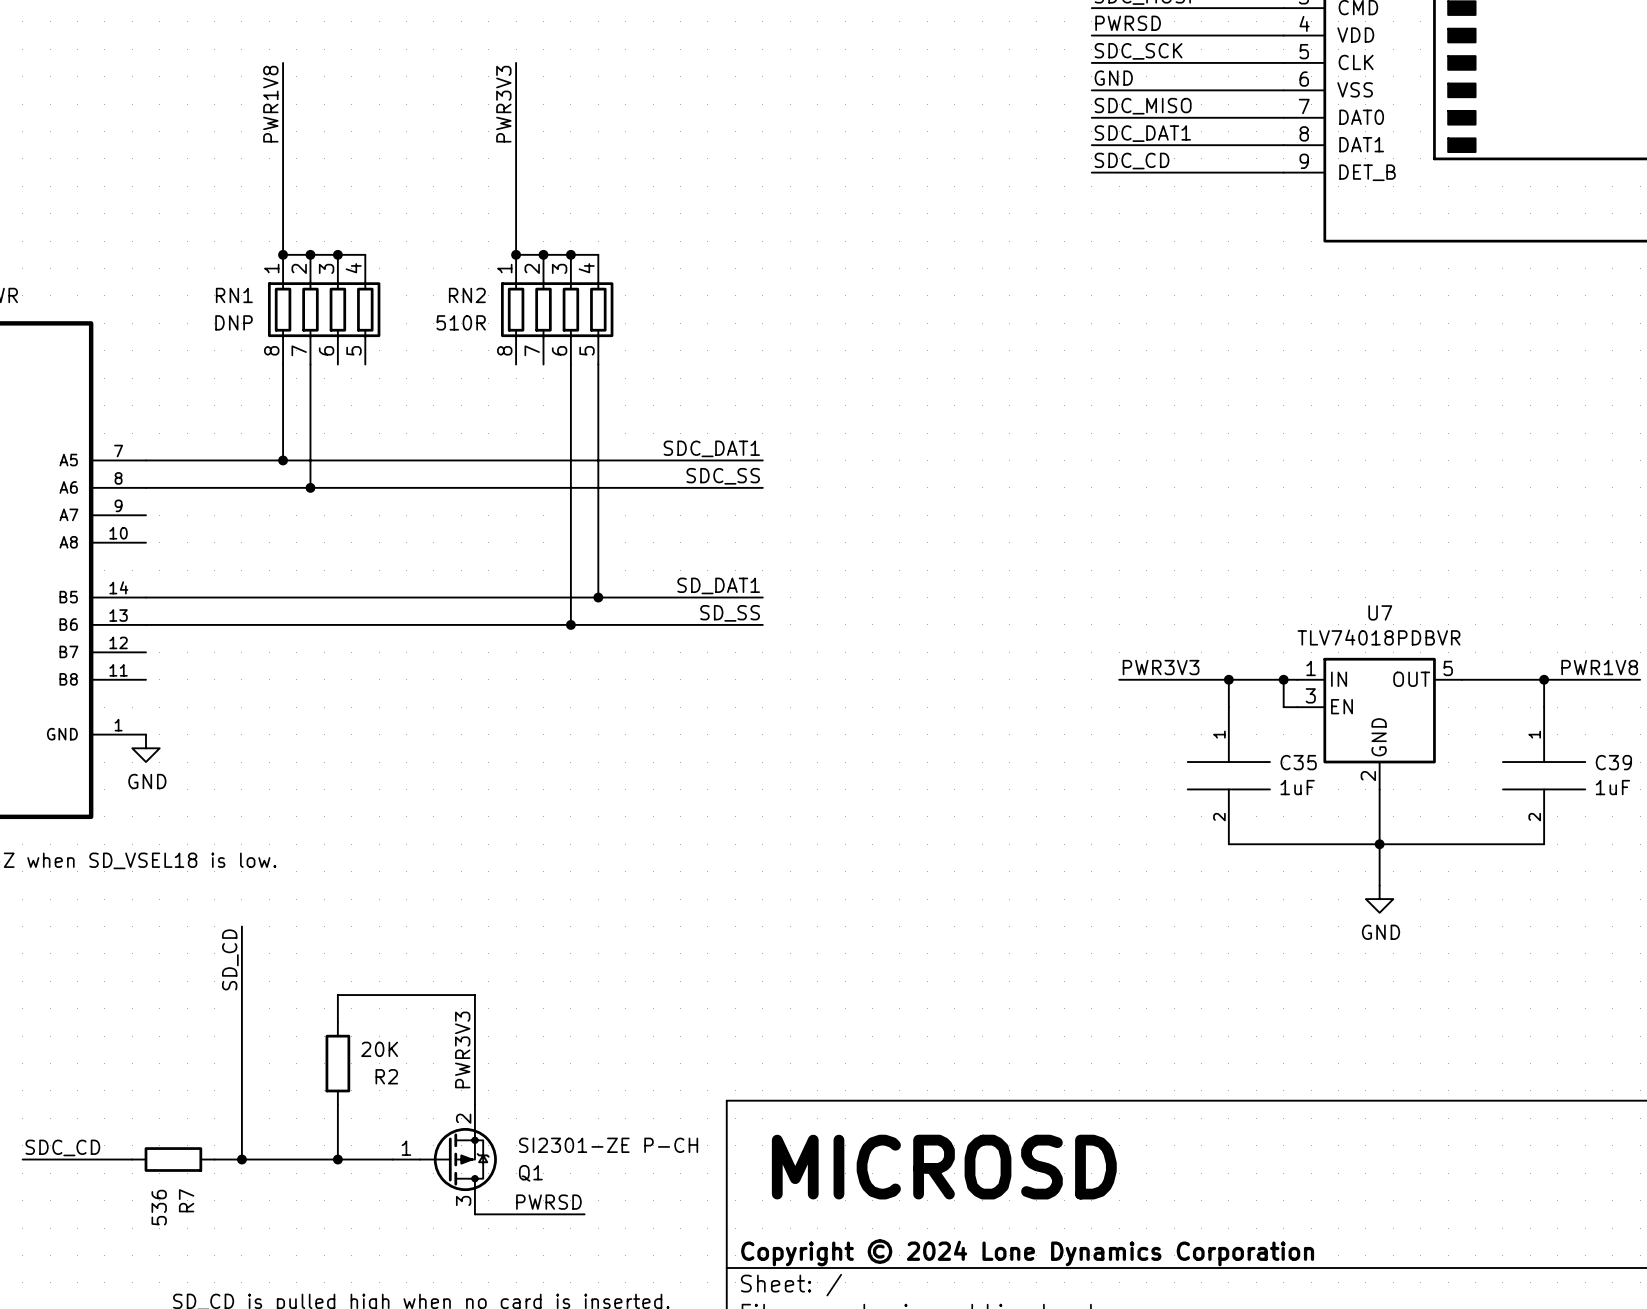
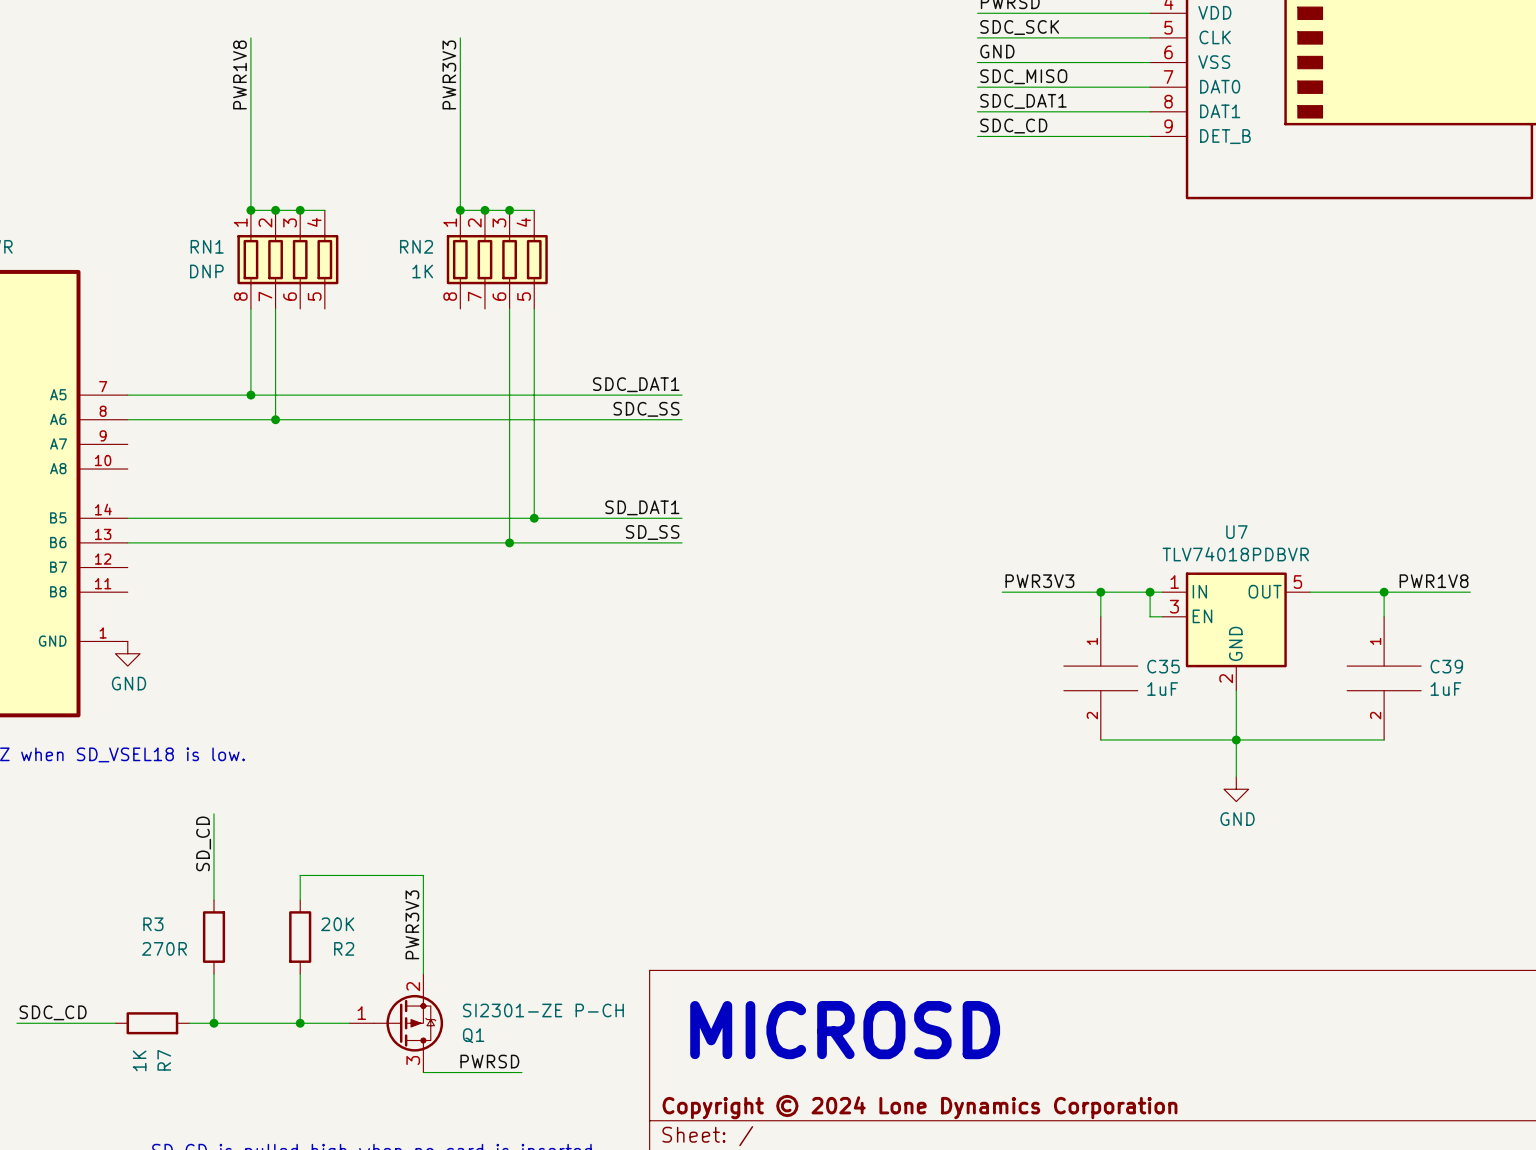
RN2 value: 510R (461, 322) -> 1K (422, 271)
wire: (241, 1022) (241, 1104) -> none
R3: none -> 270R (213, 937)
R7 value: 536 (159, 1207) -> 1K (139, 1060)

